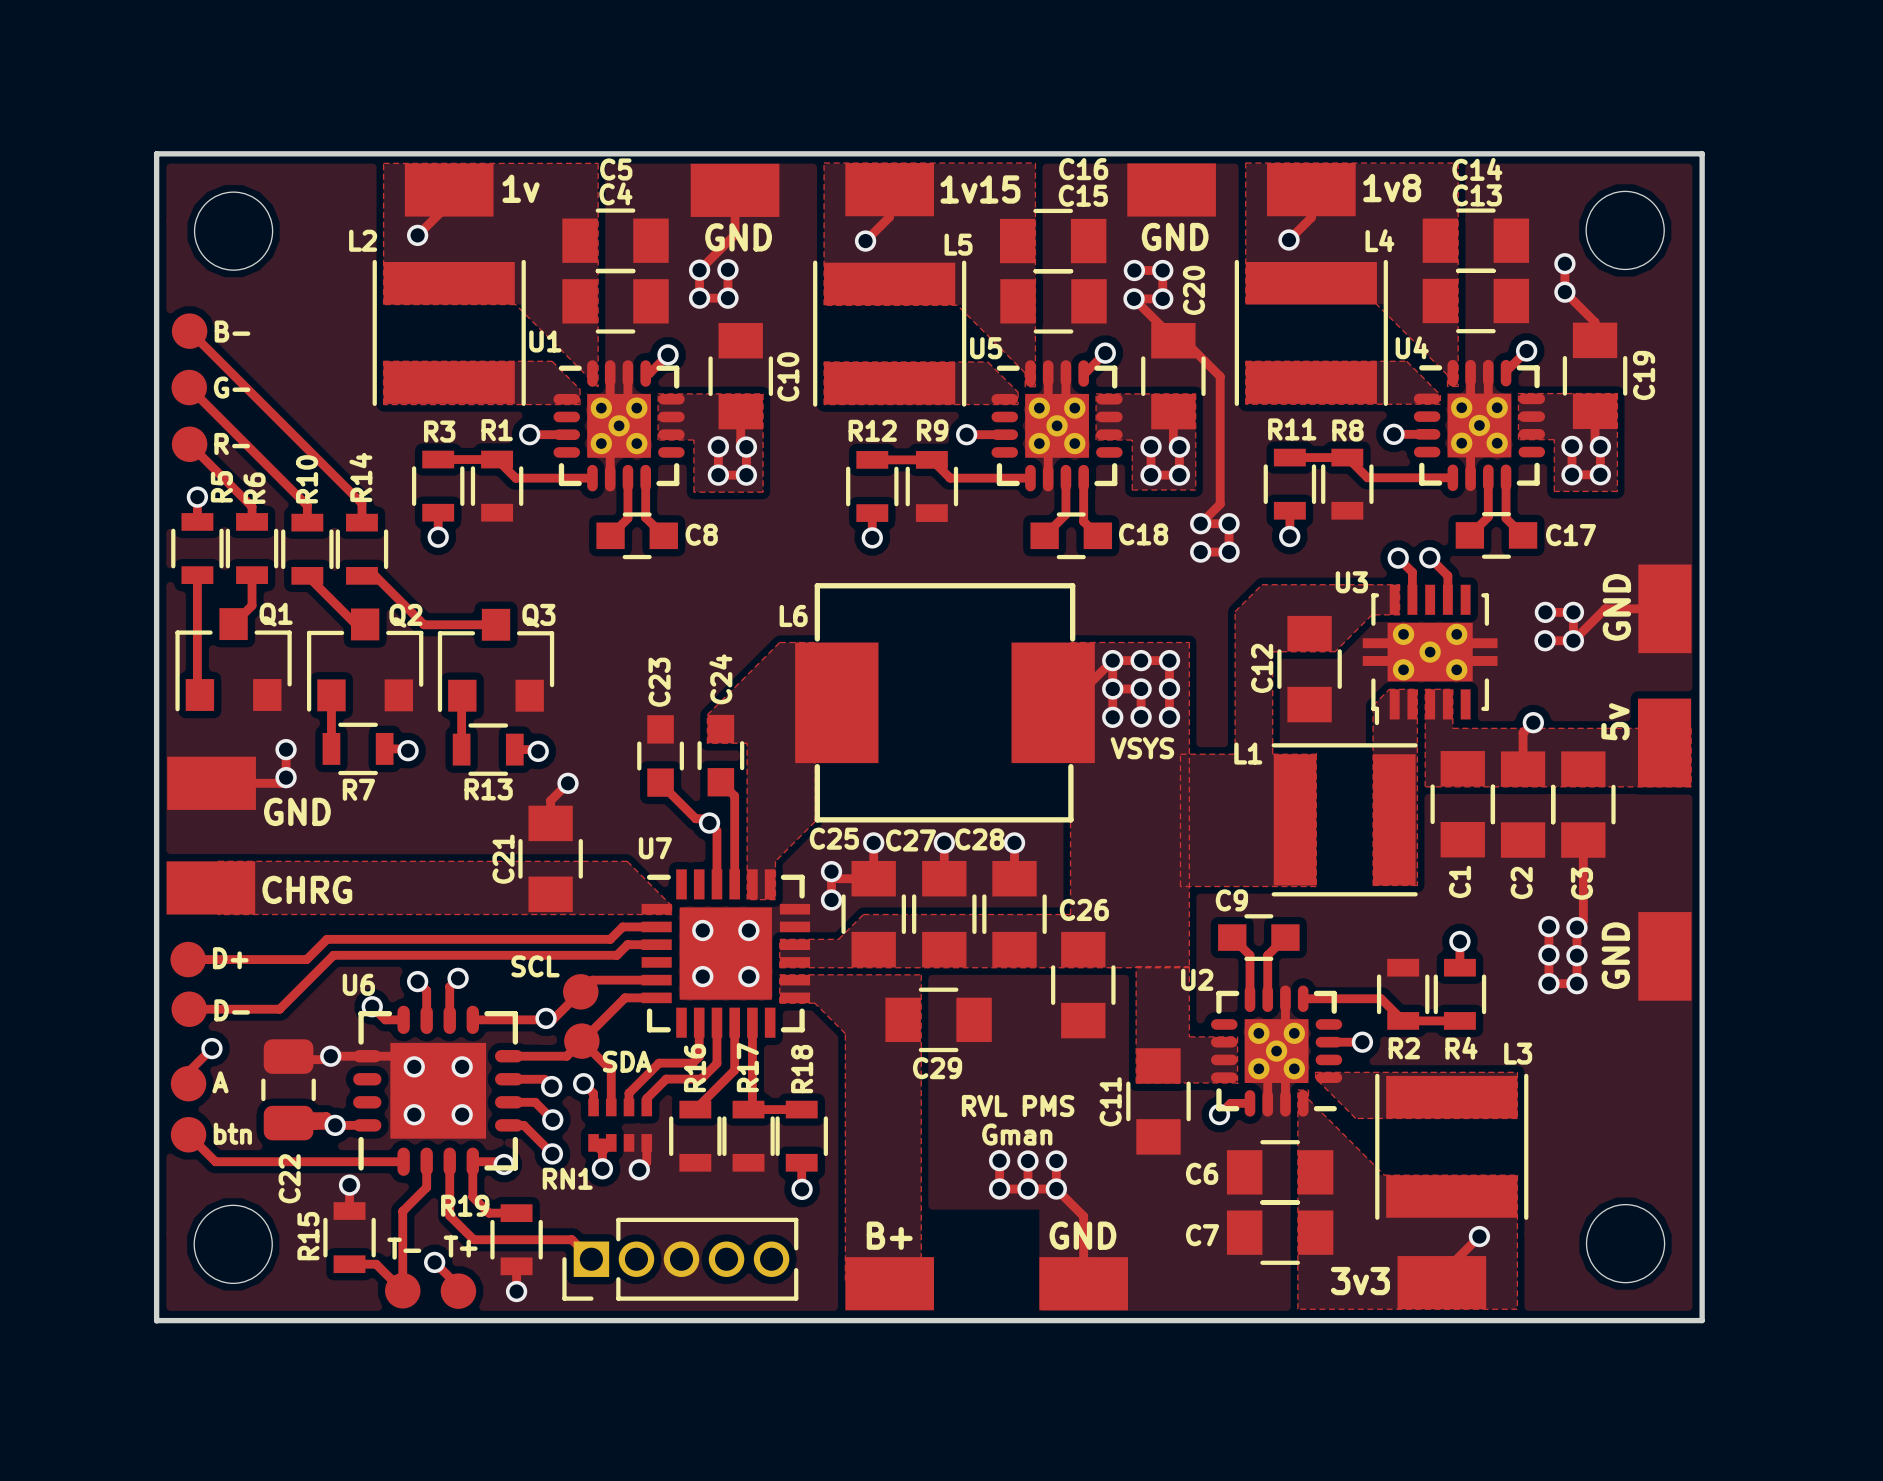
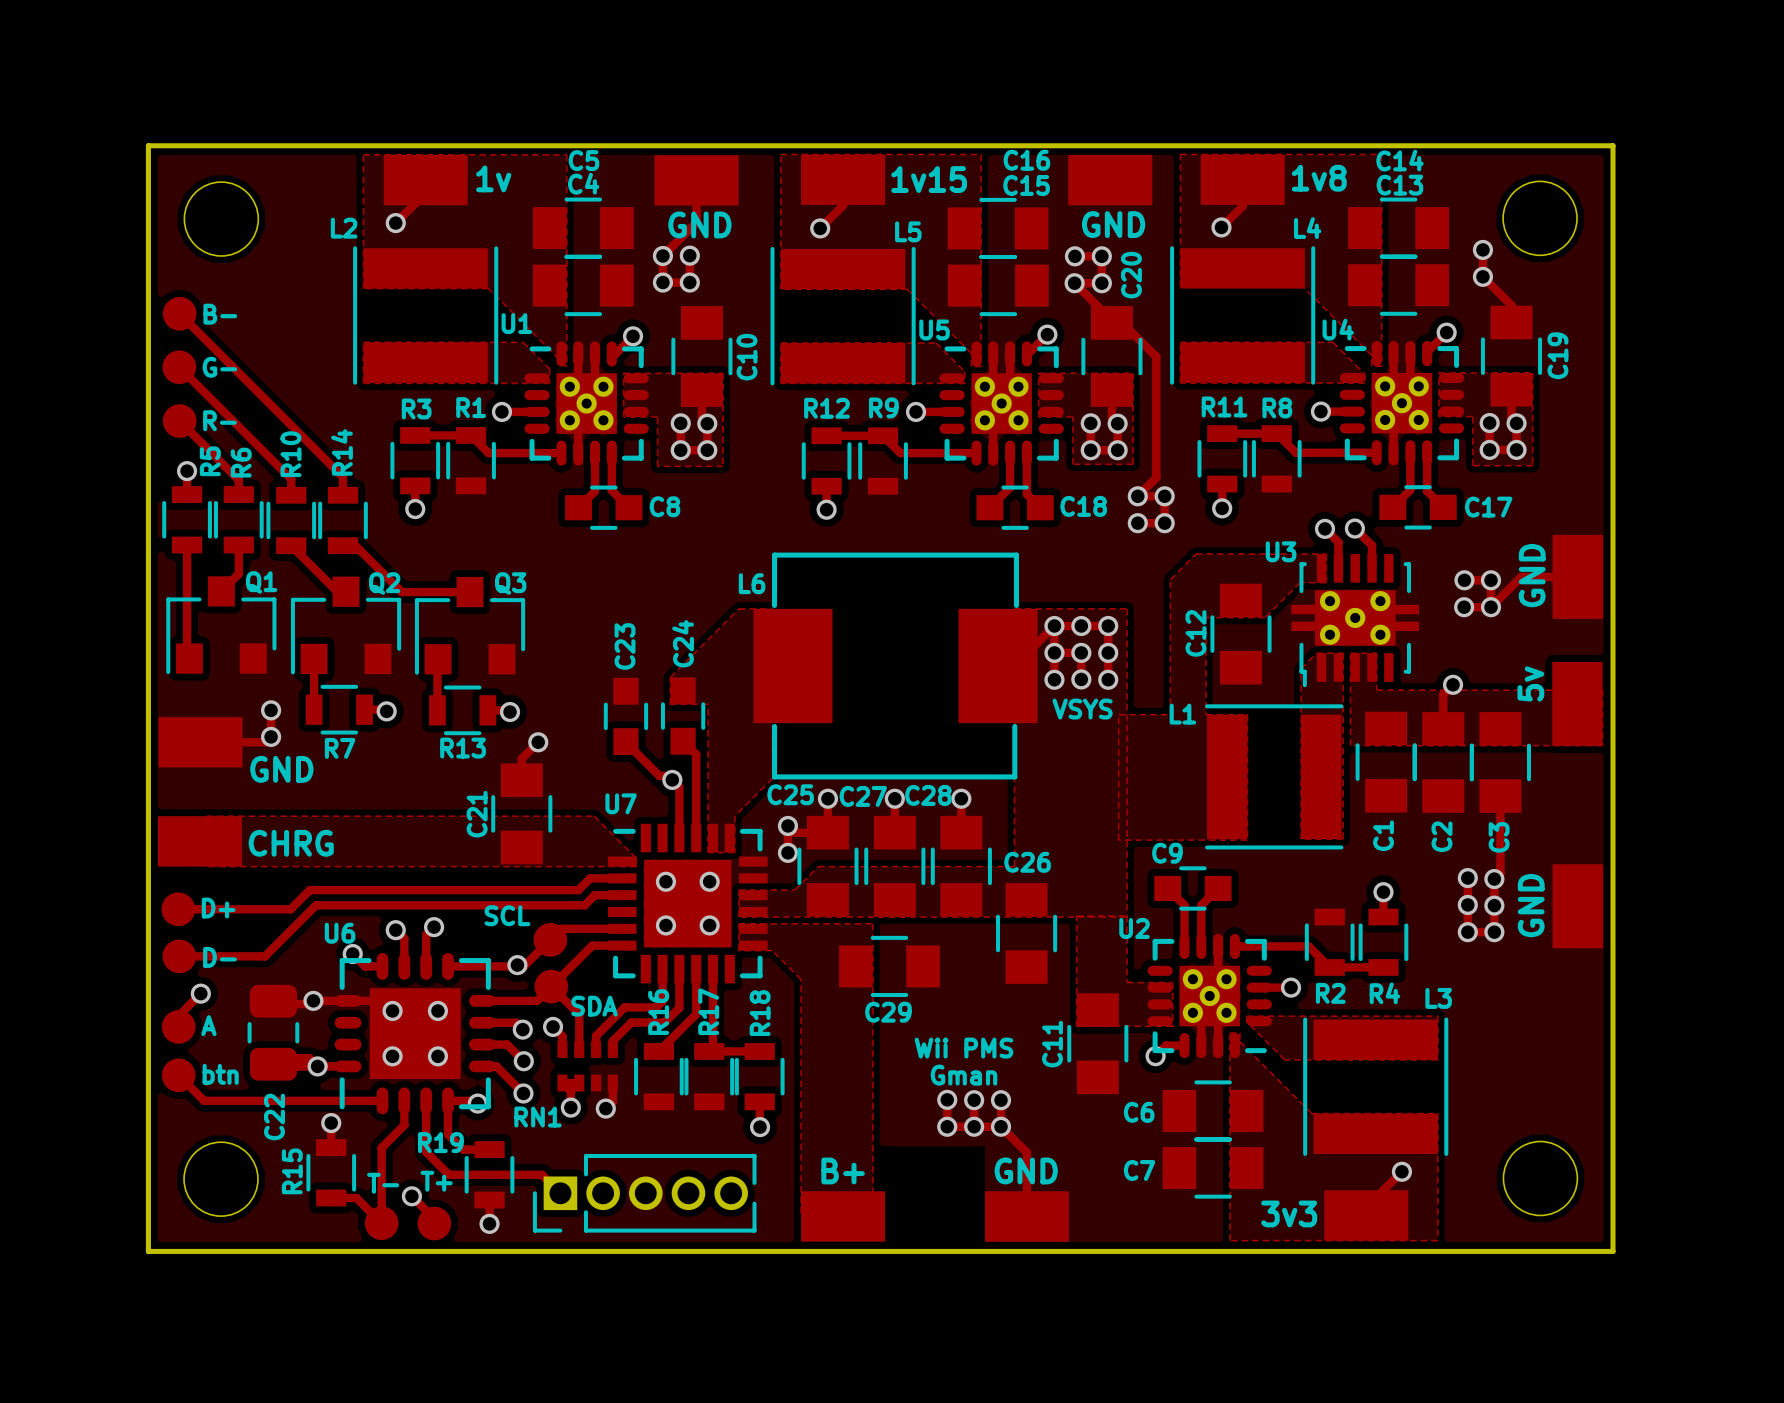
text: RVL PMS (1018, 1105) -> Wii PMS (963, 1048)

